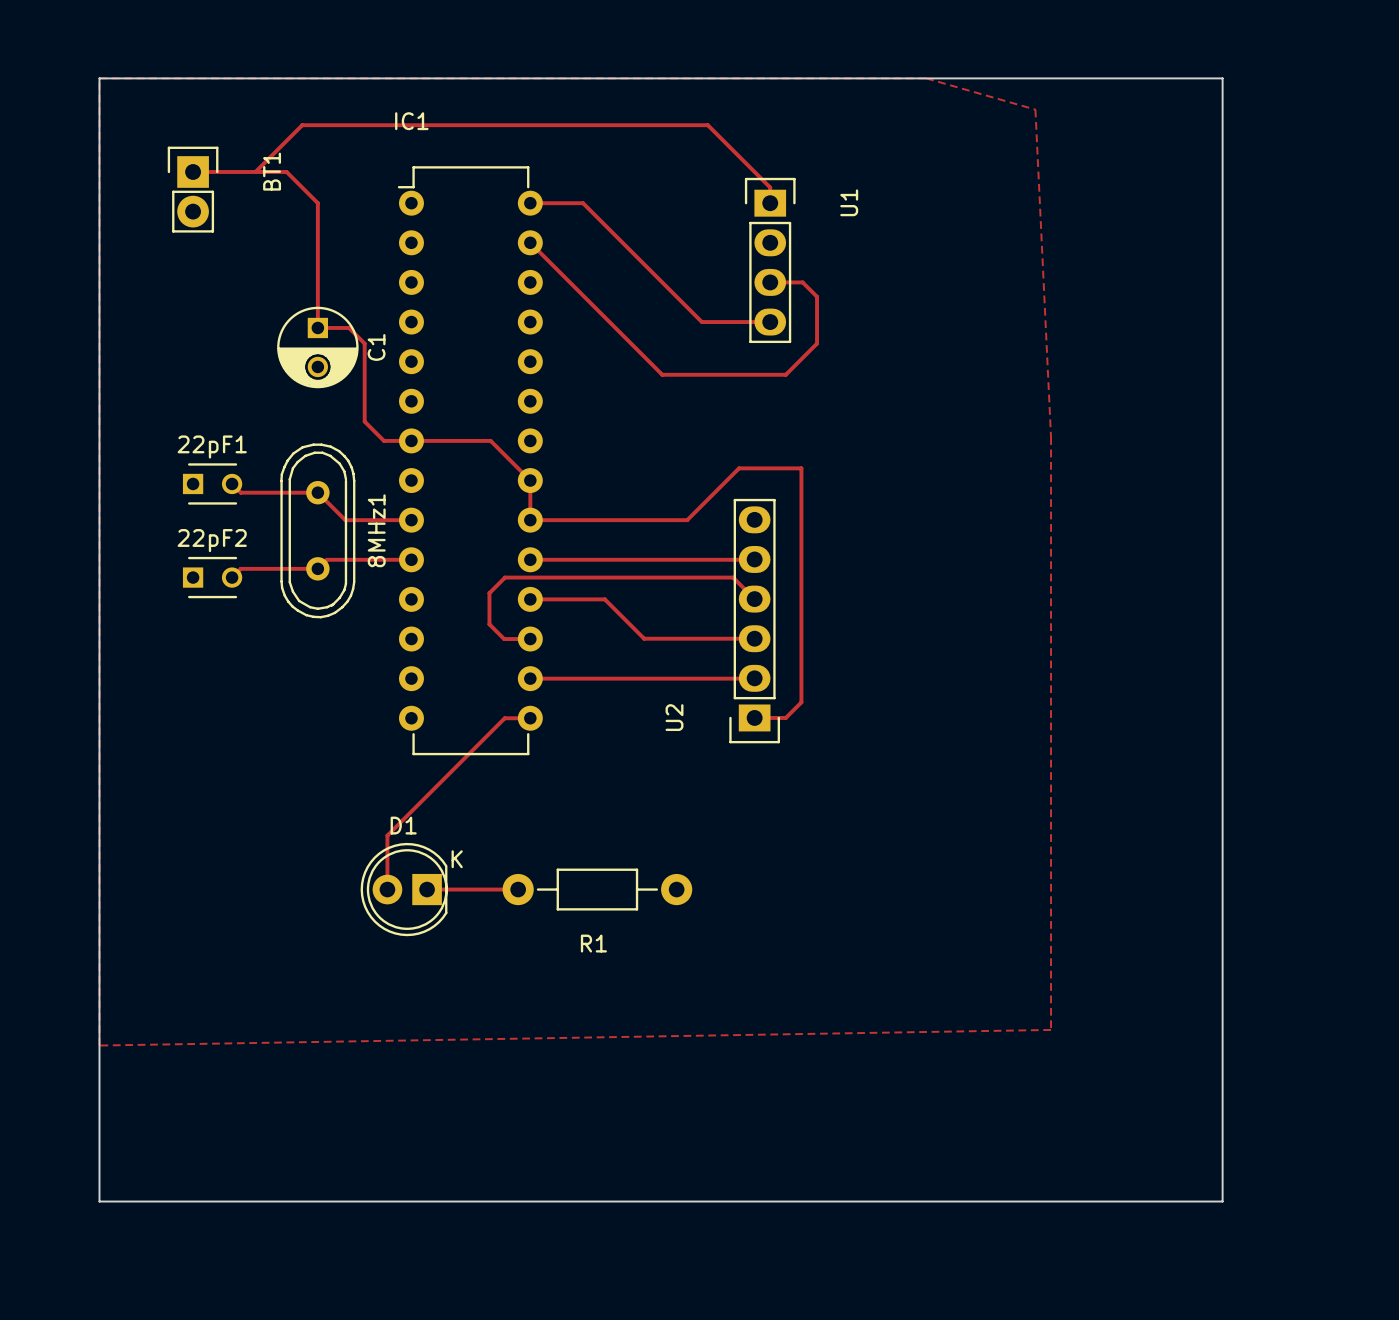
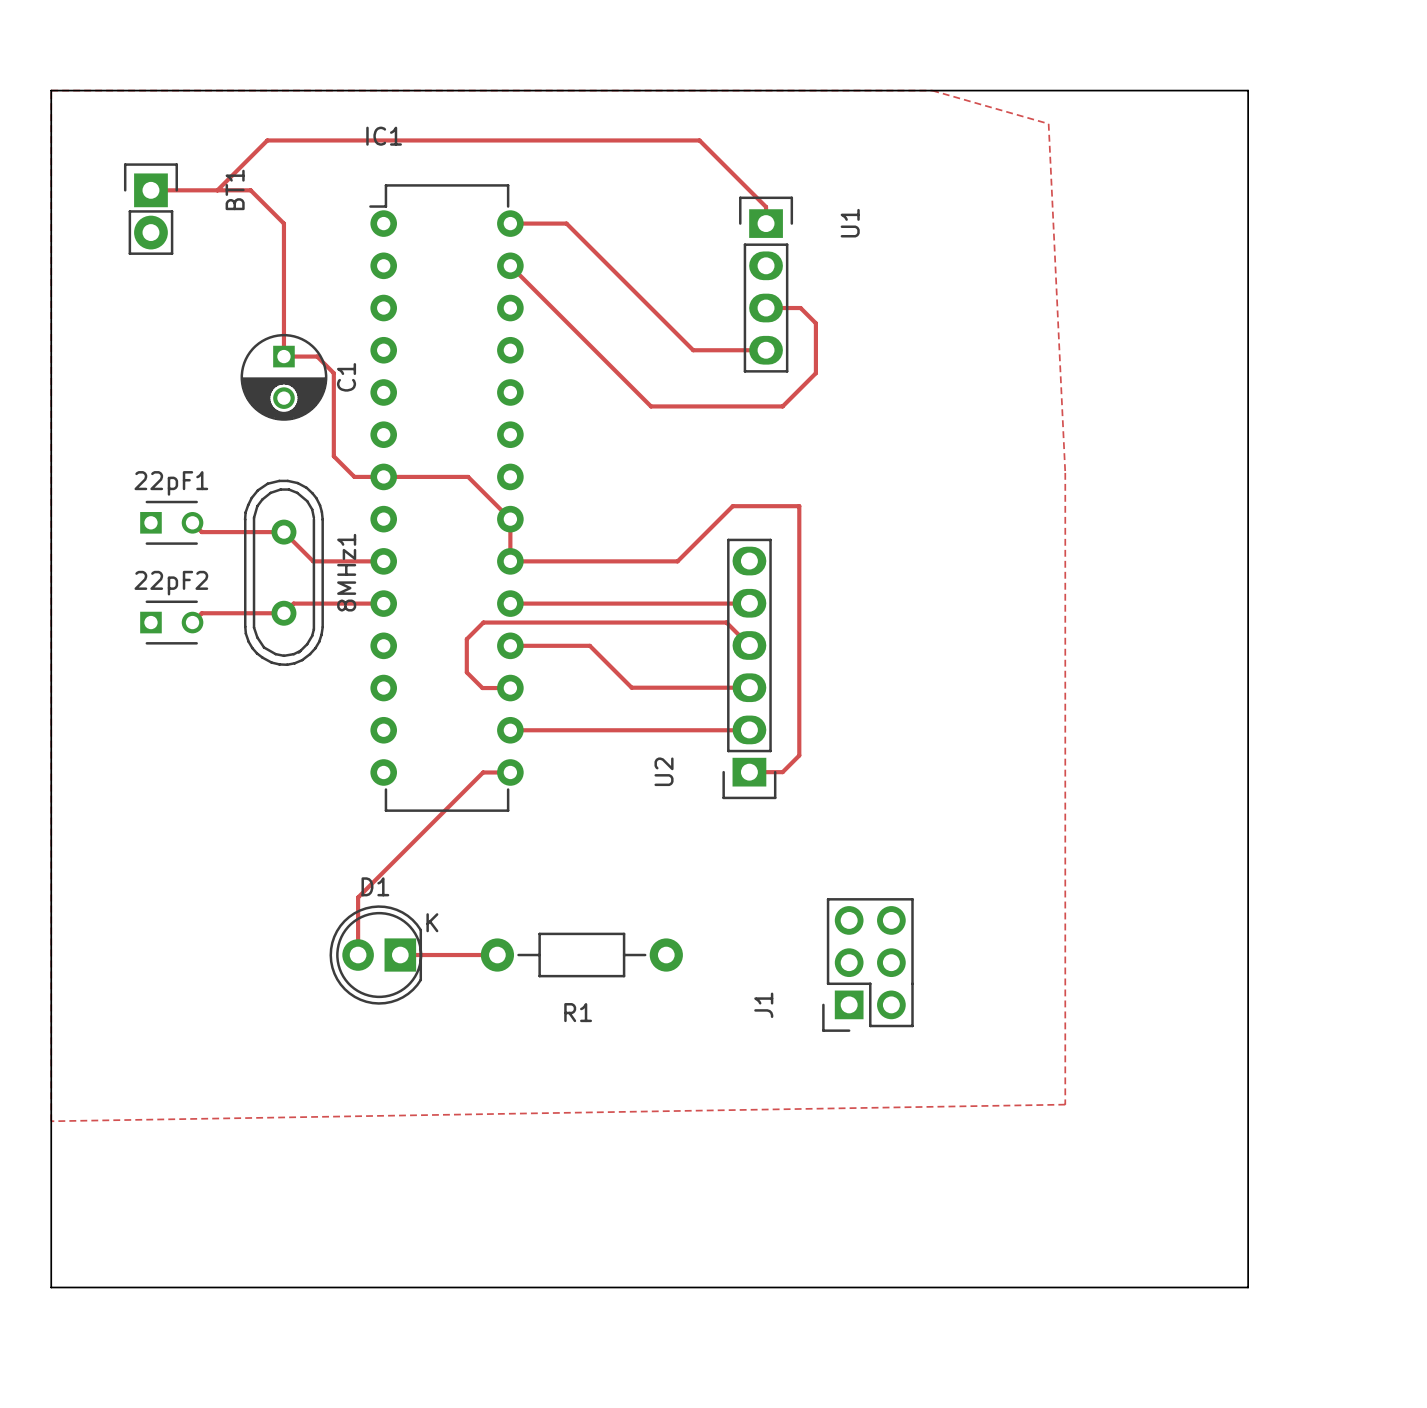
J1: none -> (867, 964)

